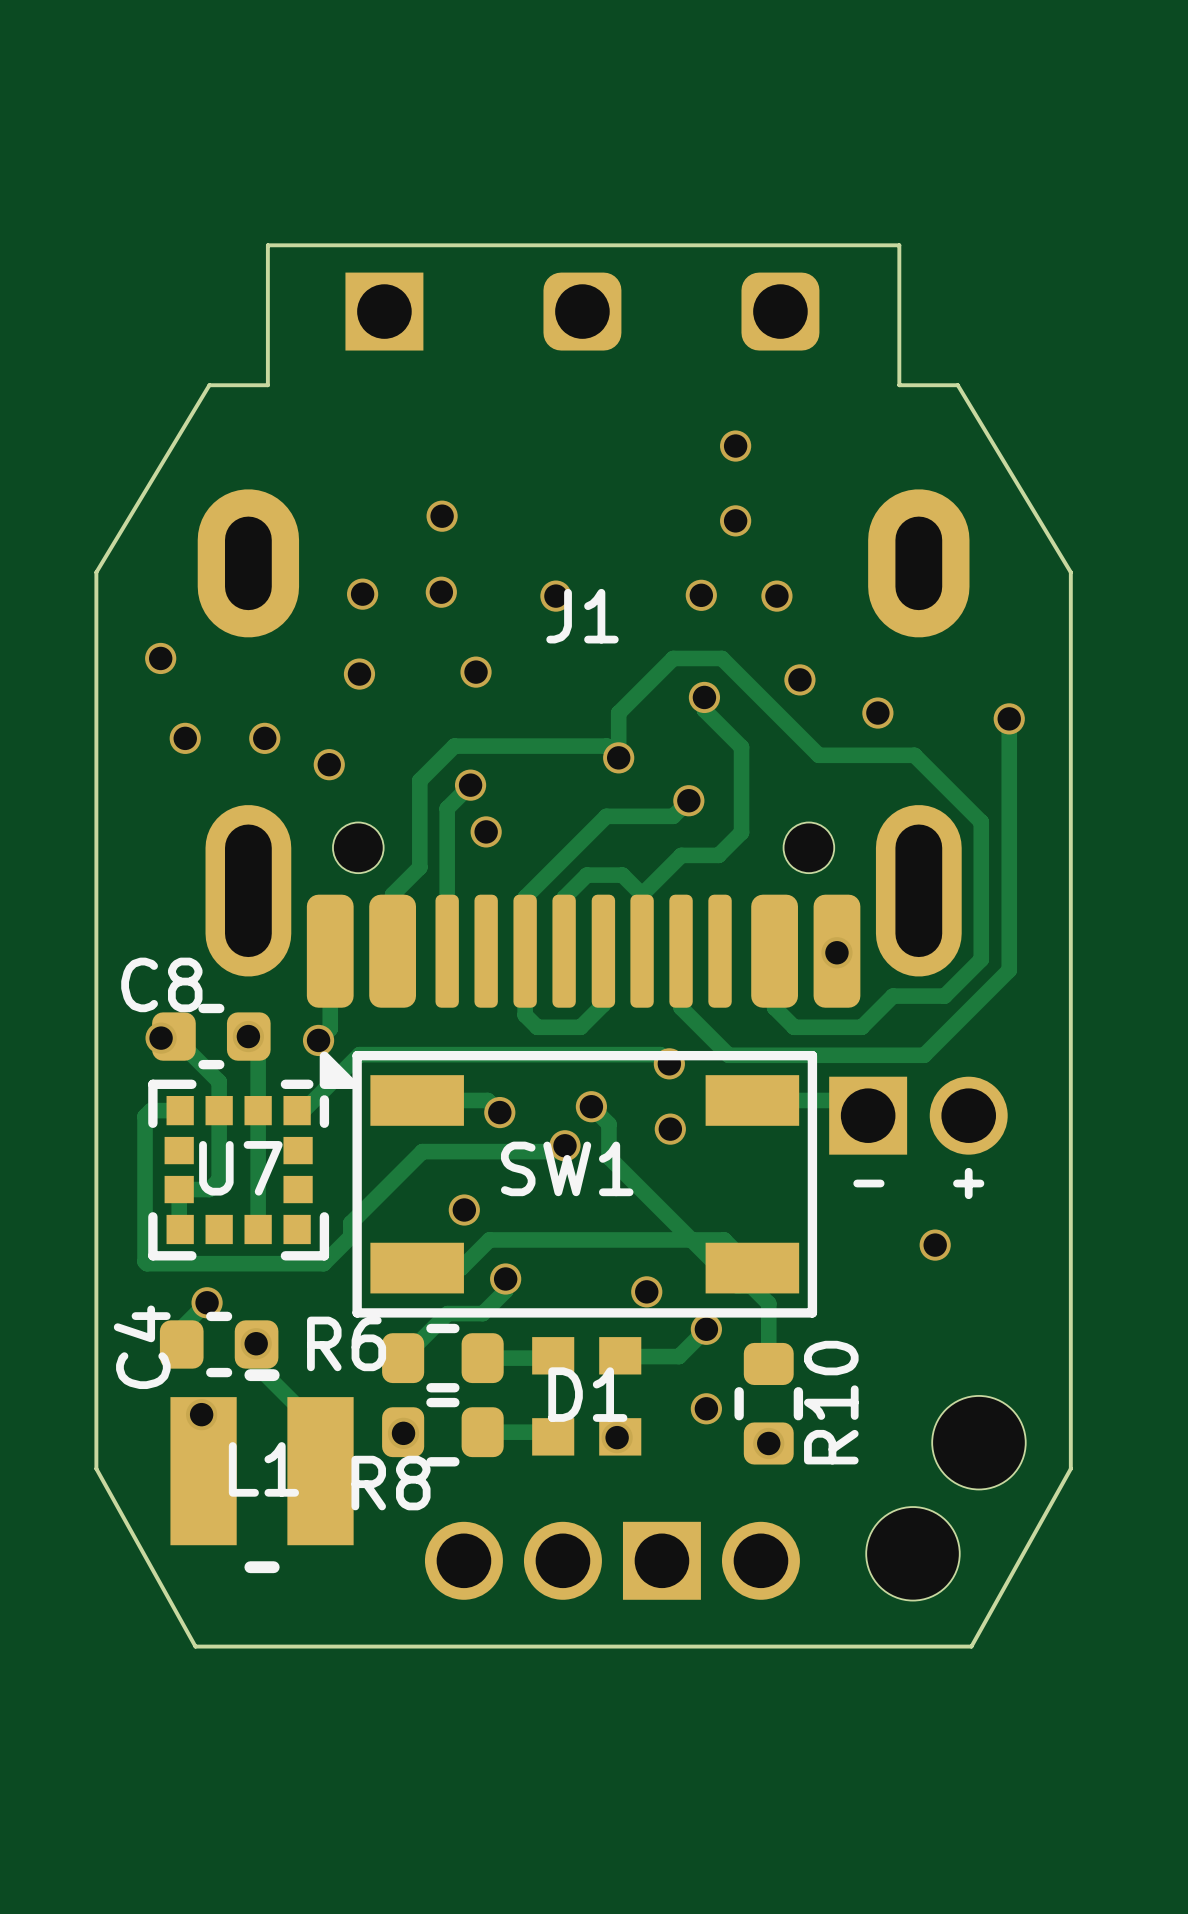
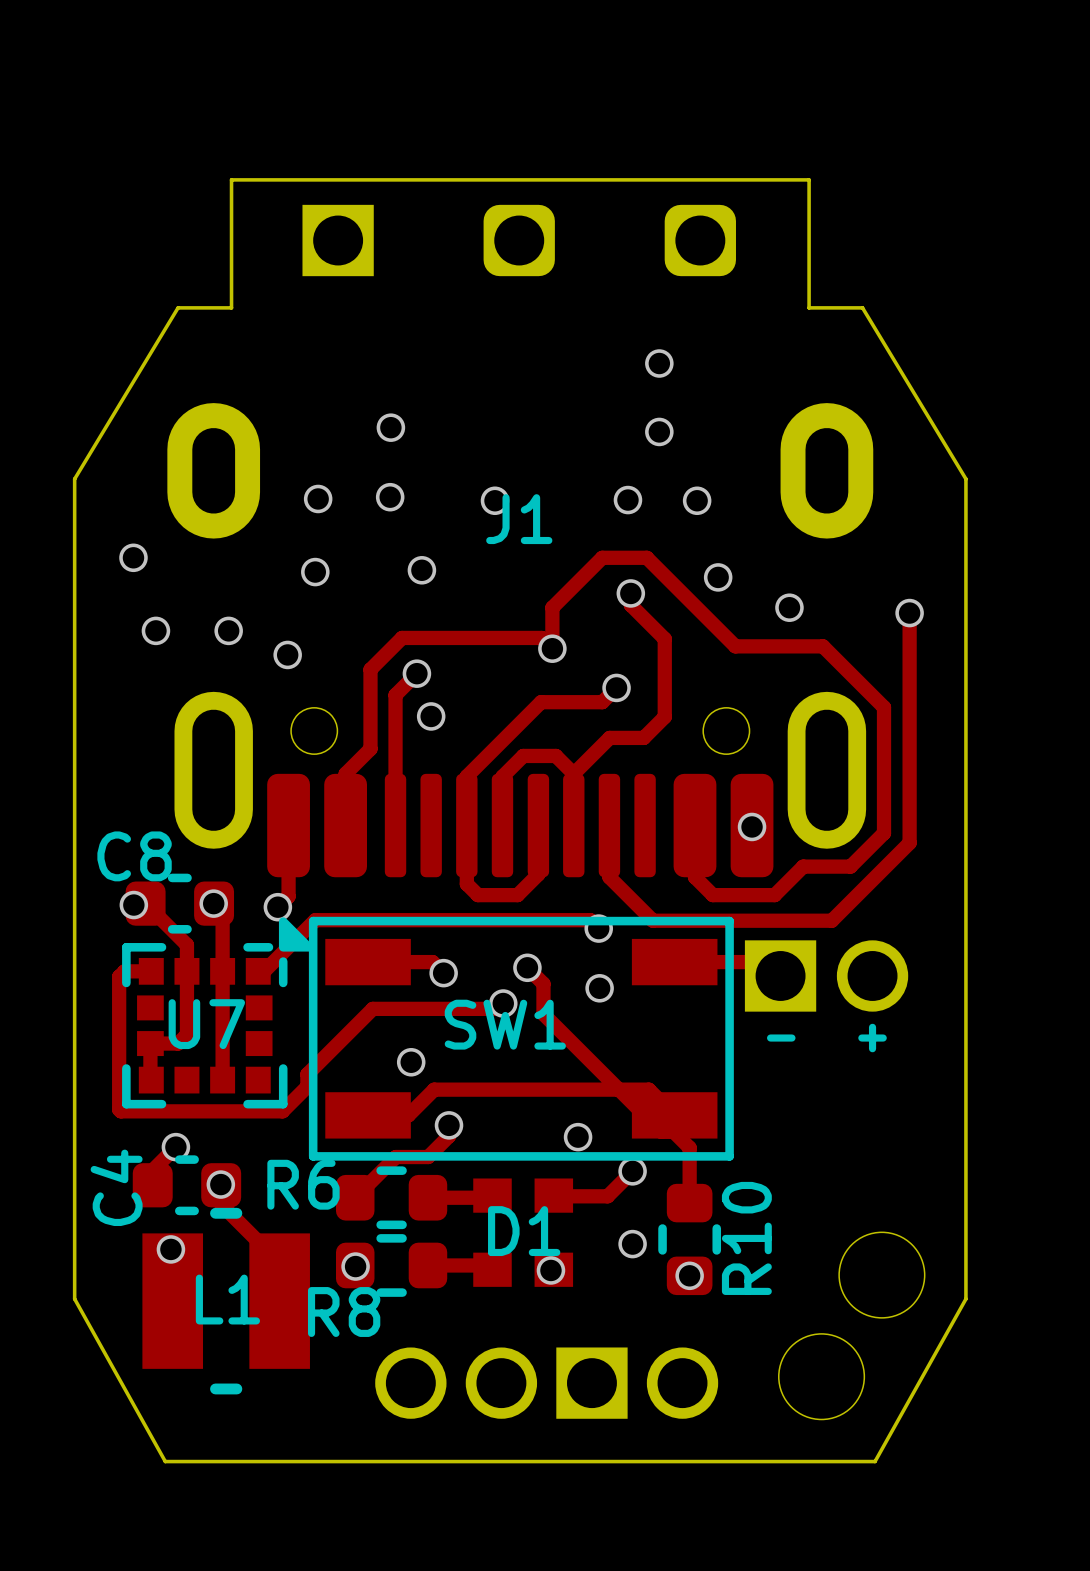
via: (935, 1245) -> none

